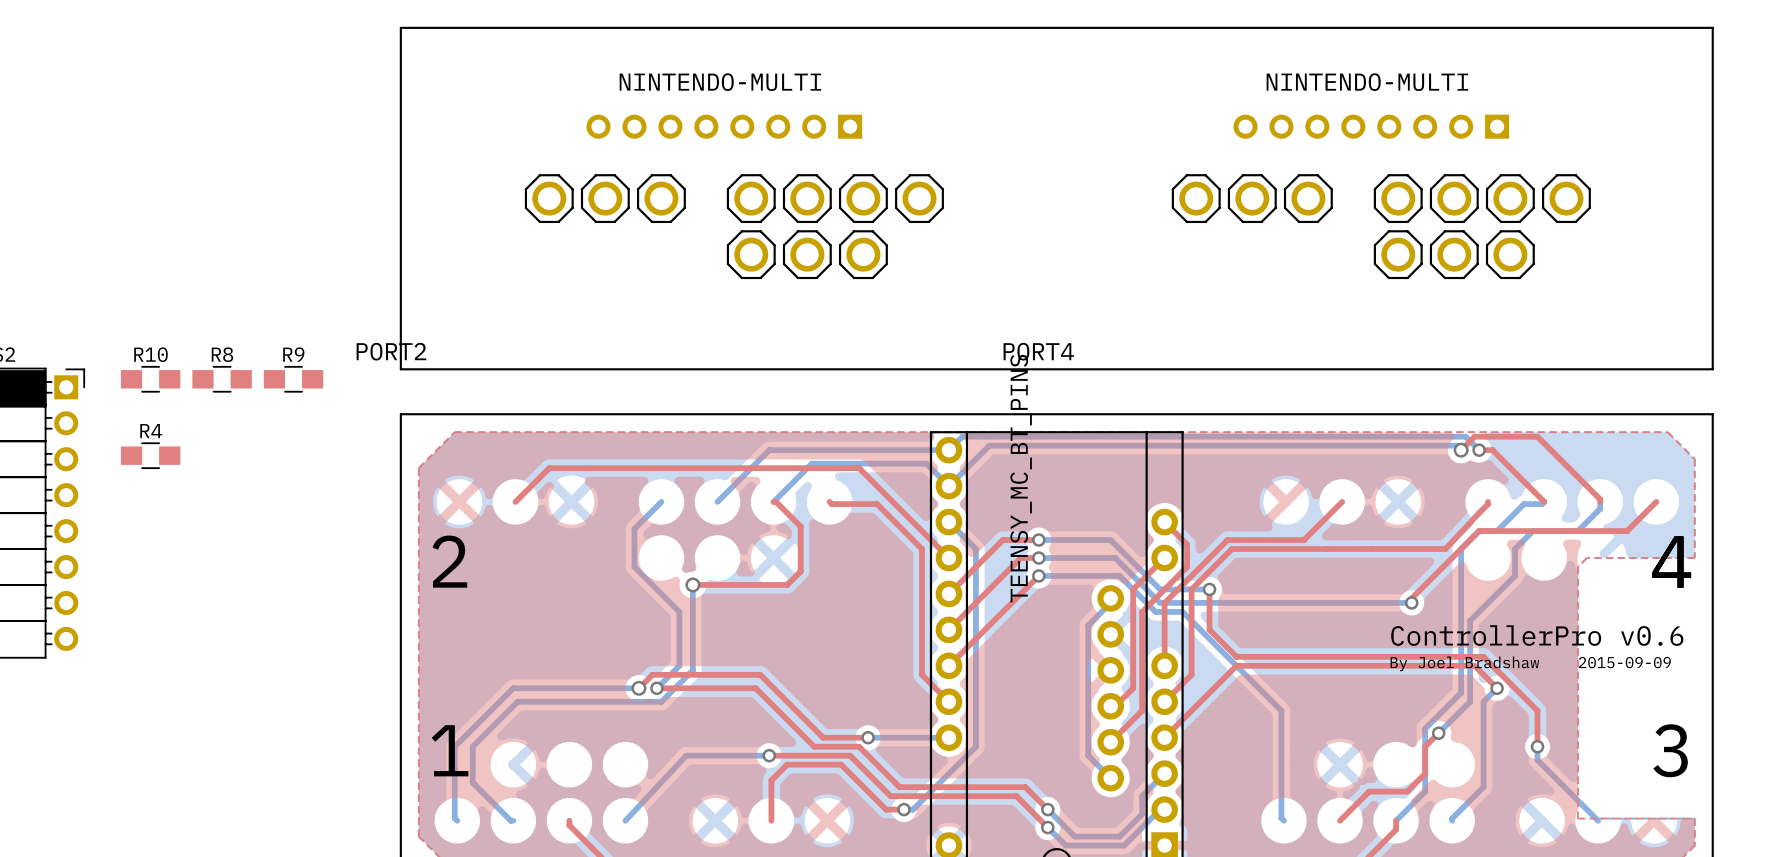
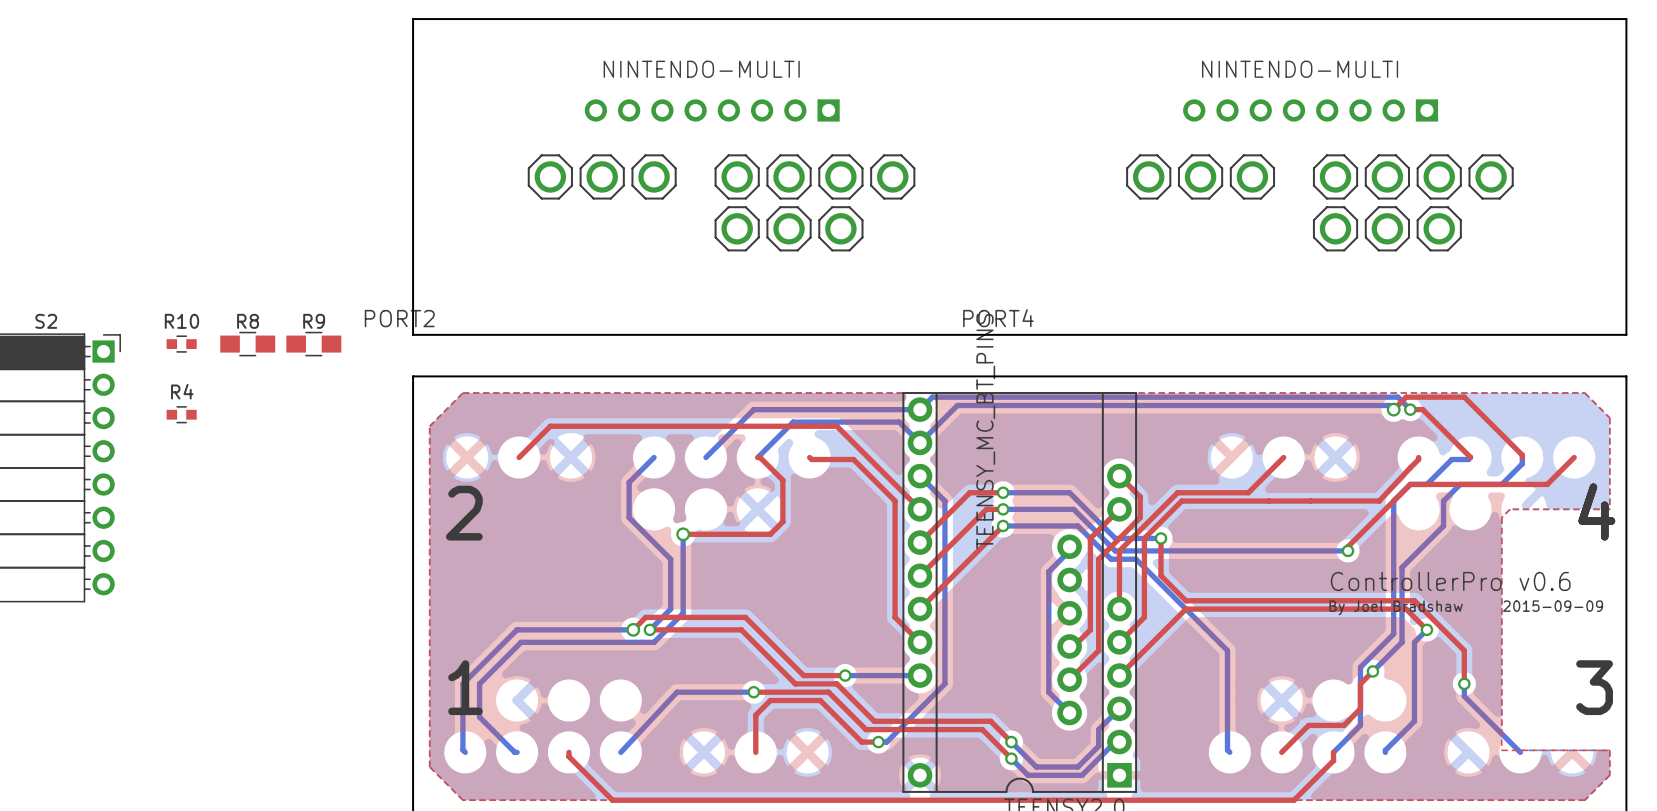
R10 footprint: [120, 365, 181, 393] -> [166, 335, 197, 353]
R4 footprint: [120, 442, 181, 469] -> [166, 406, 197, 424]

